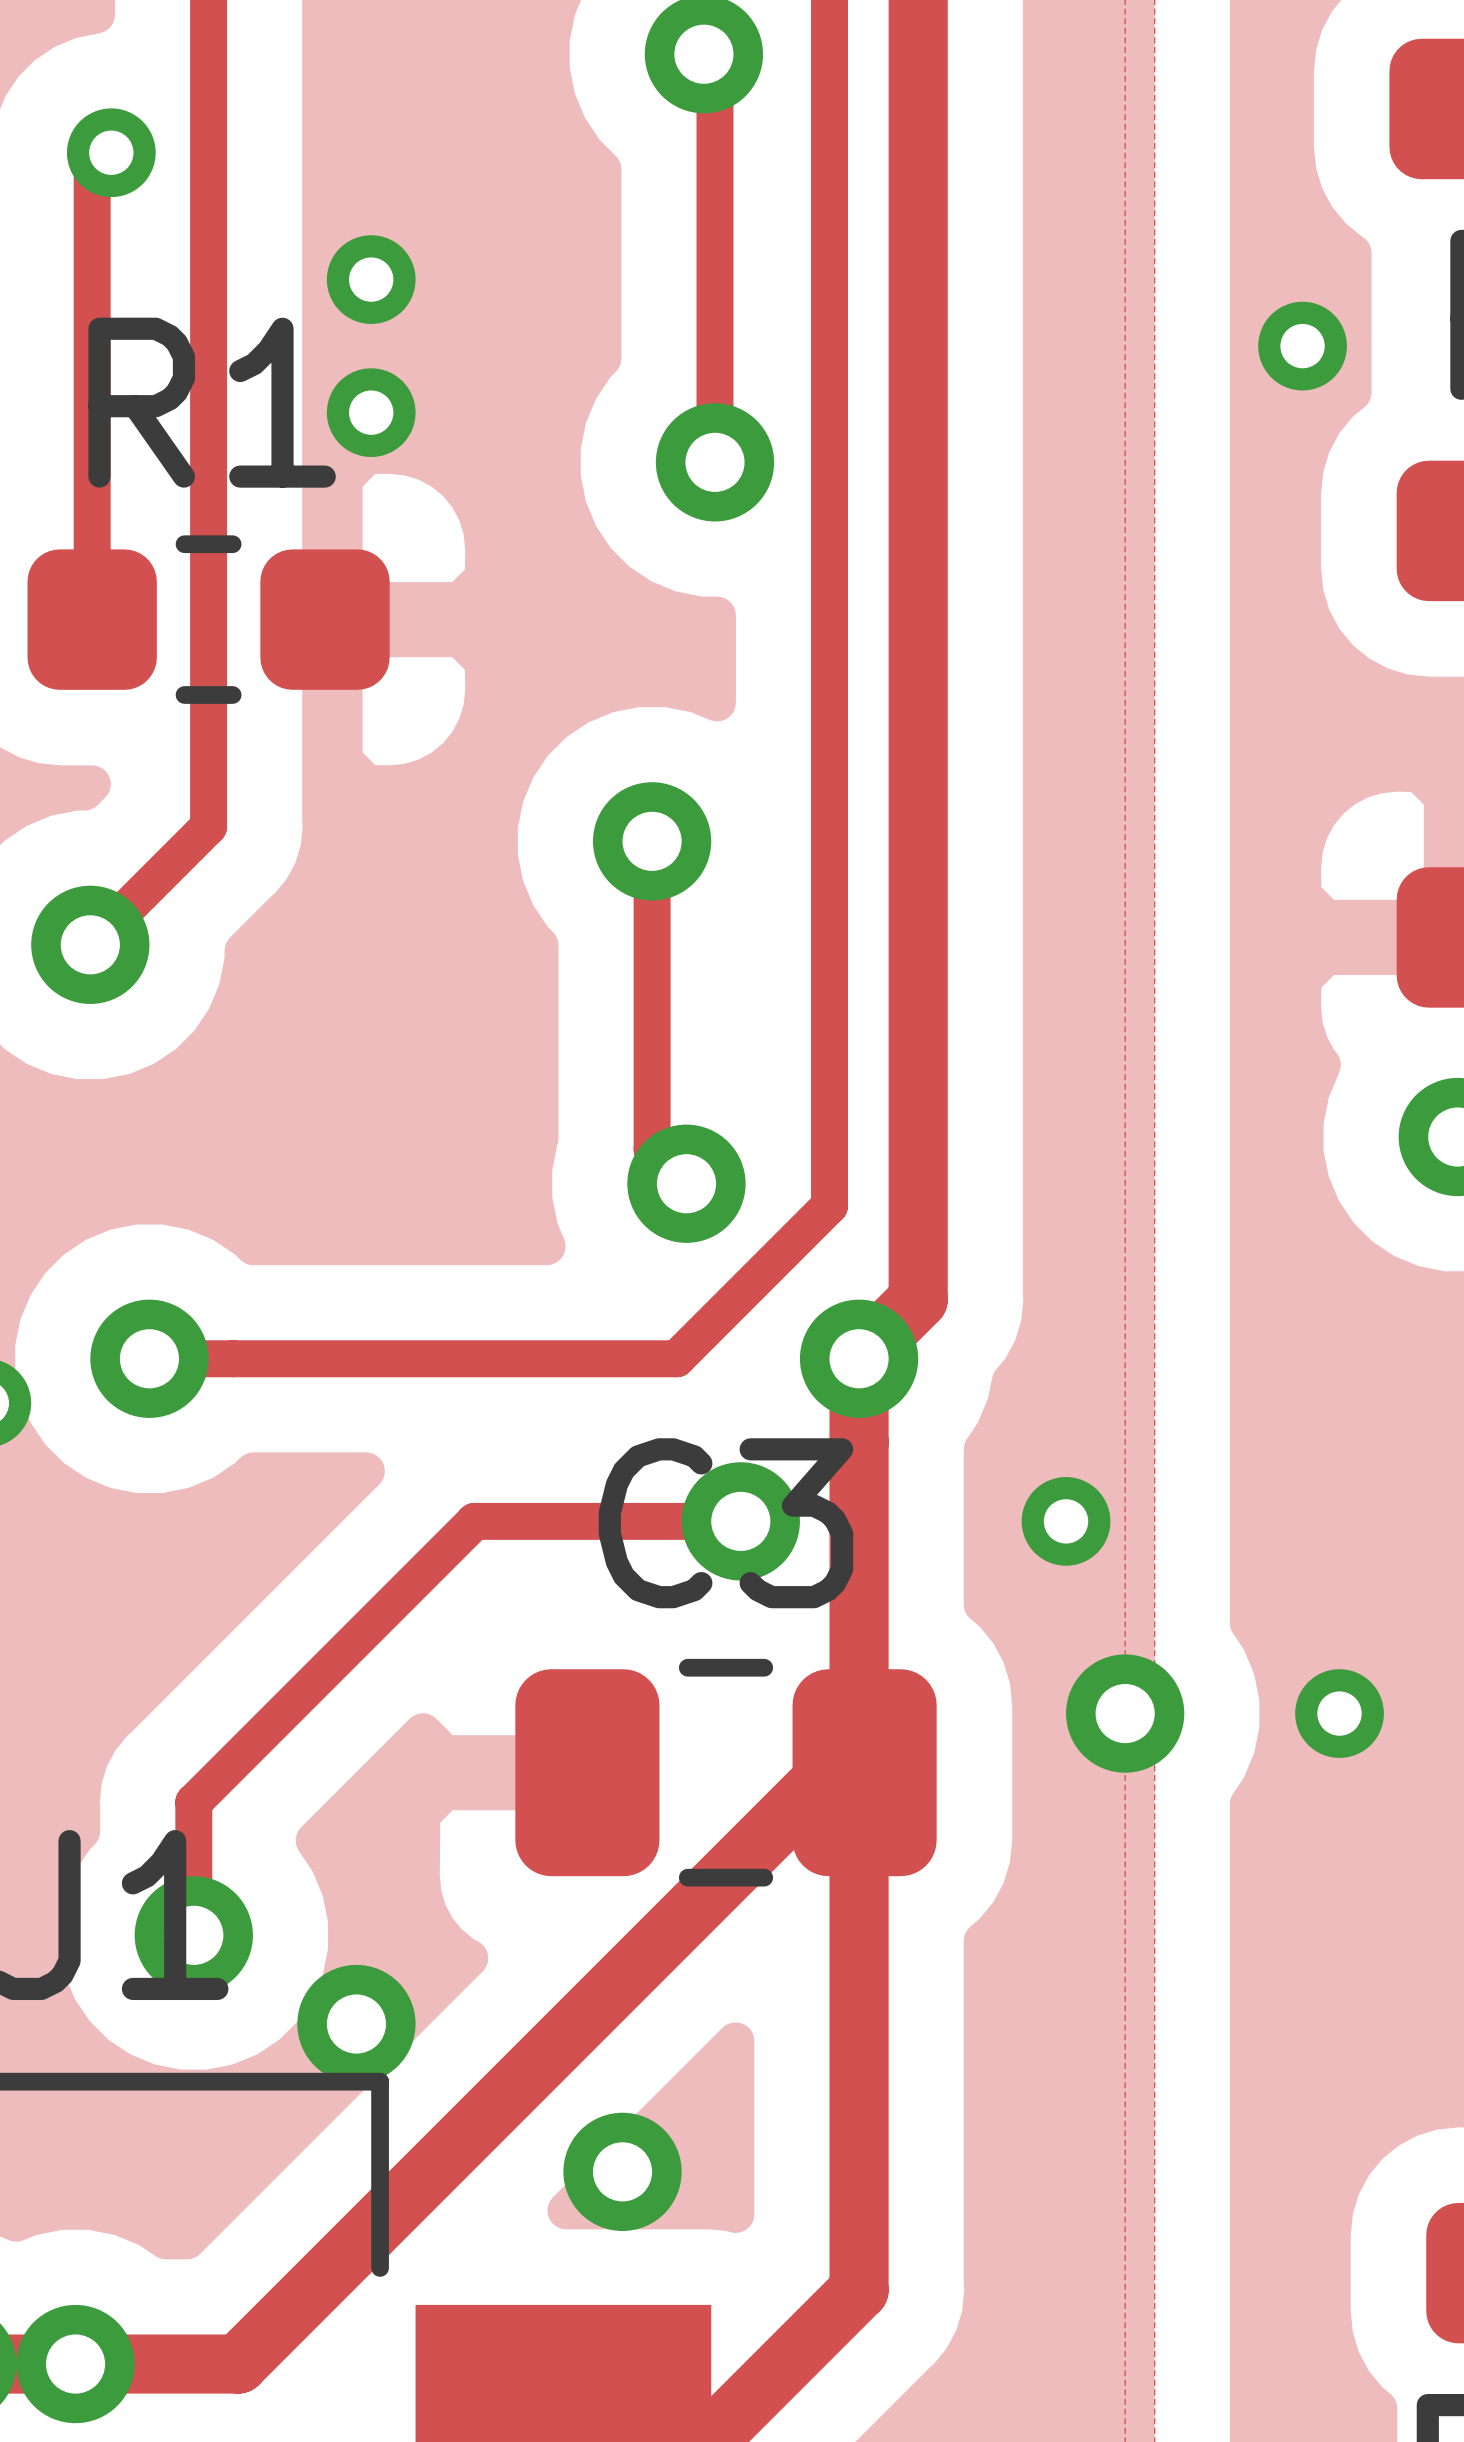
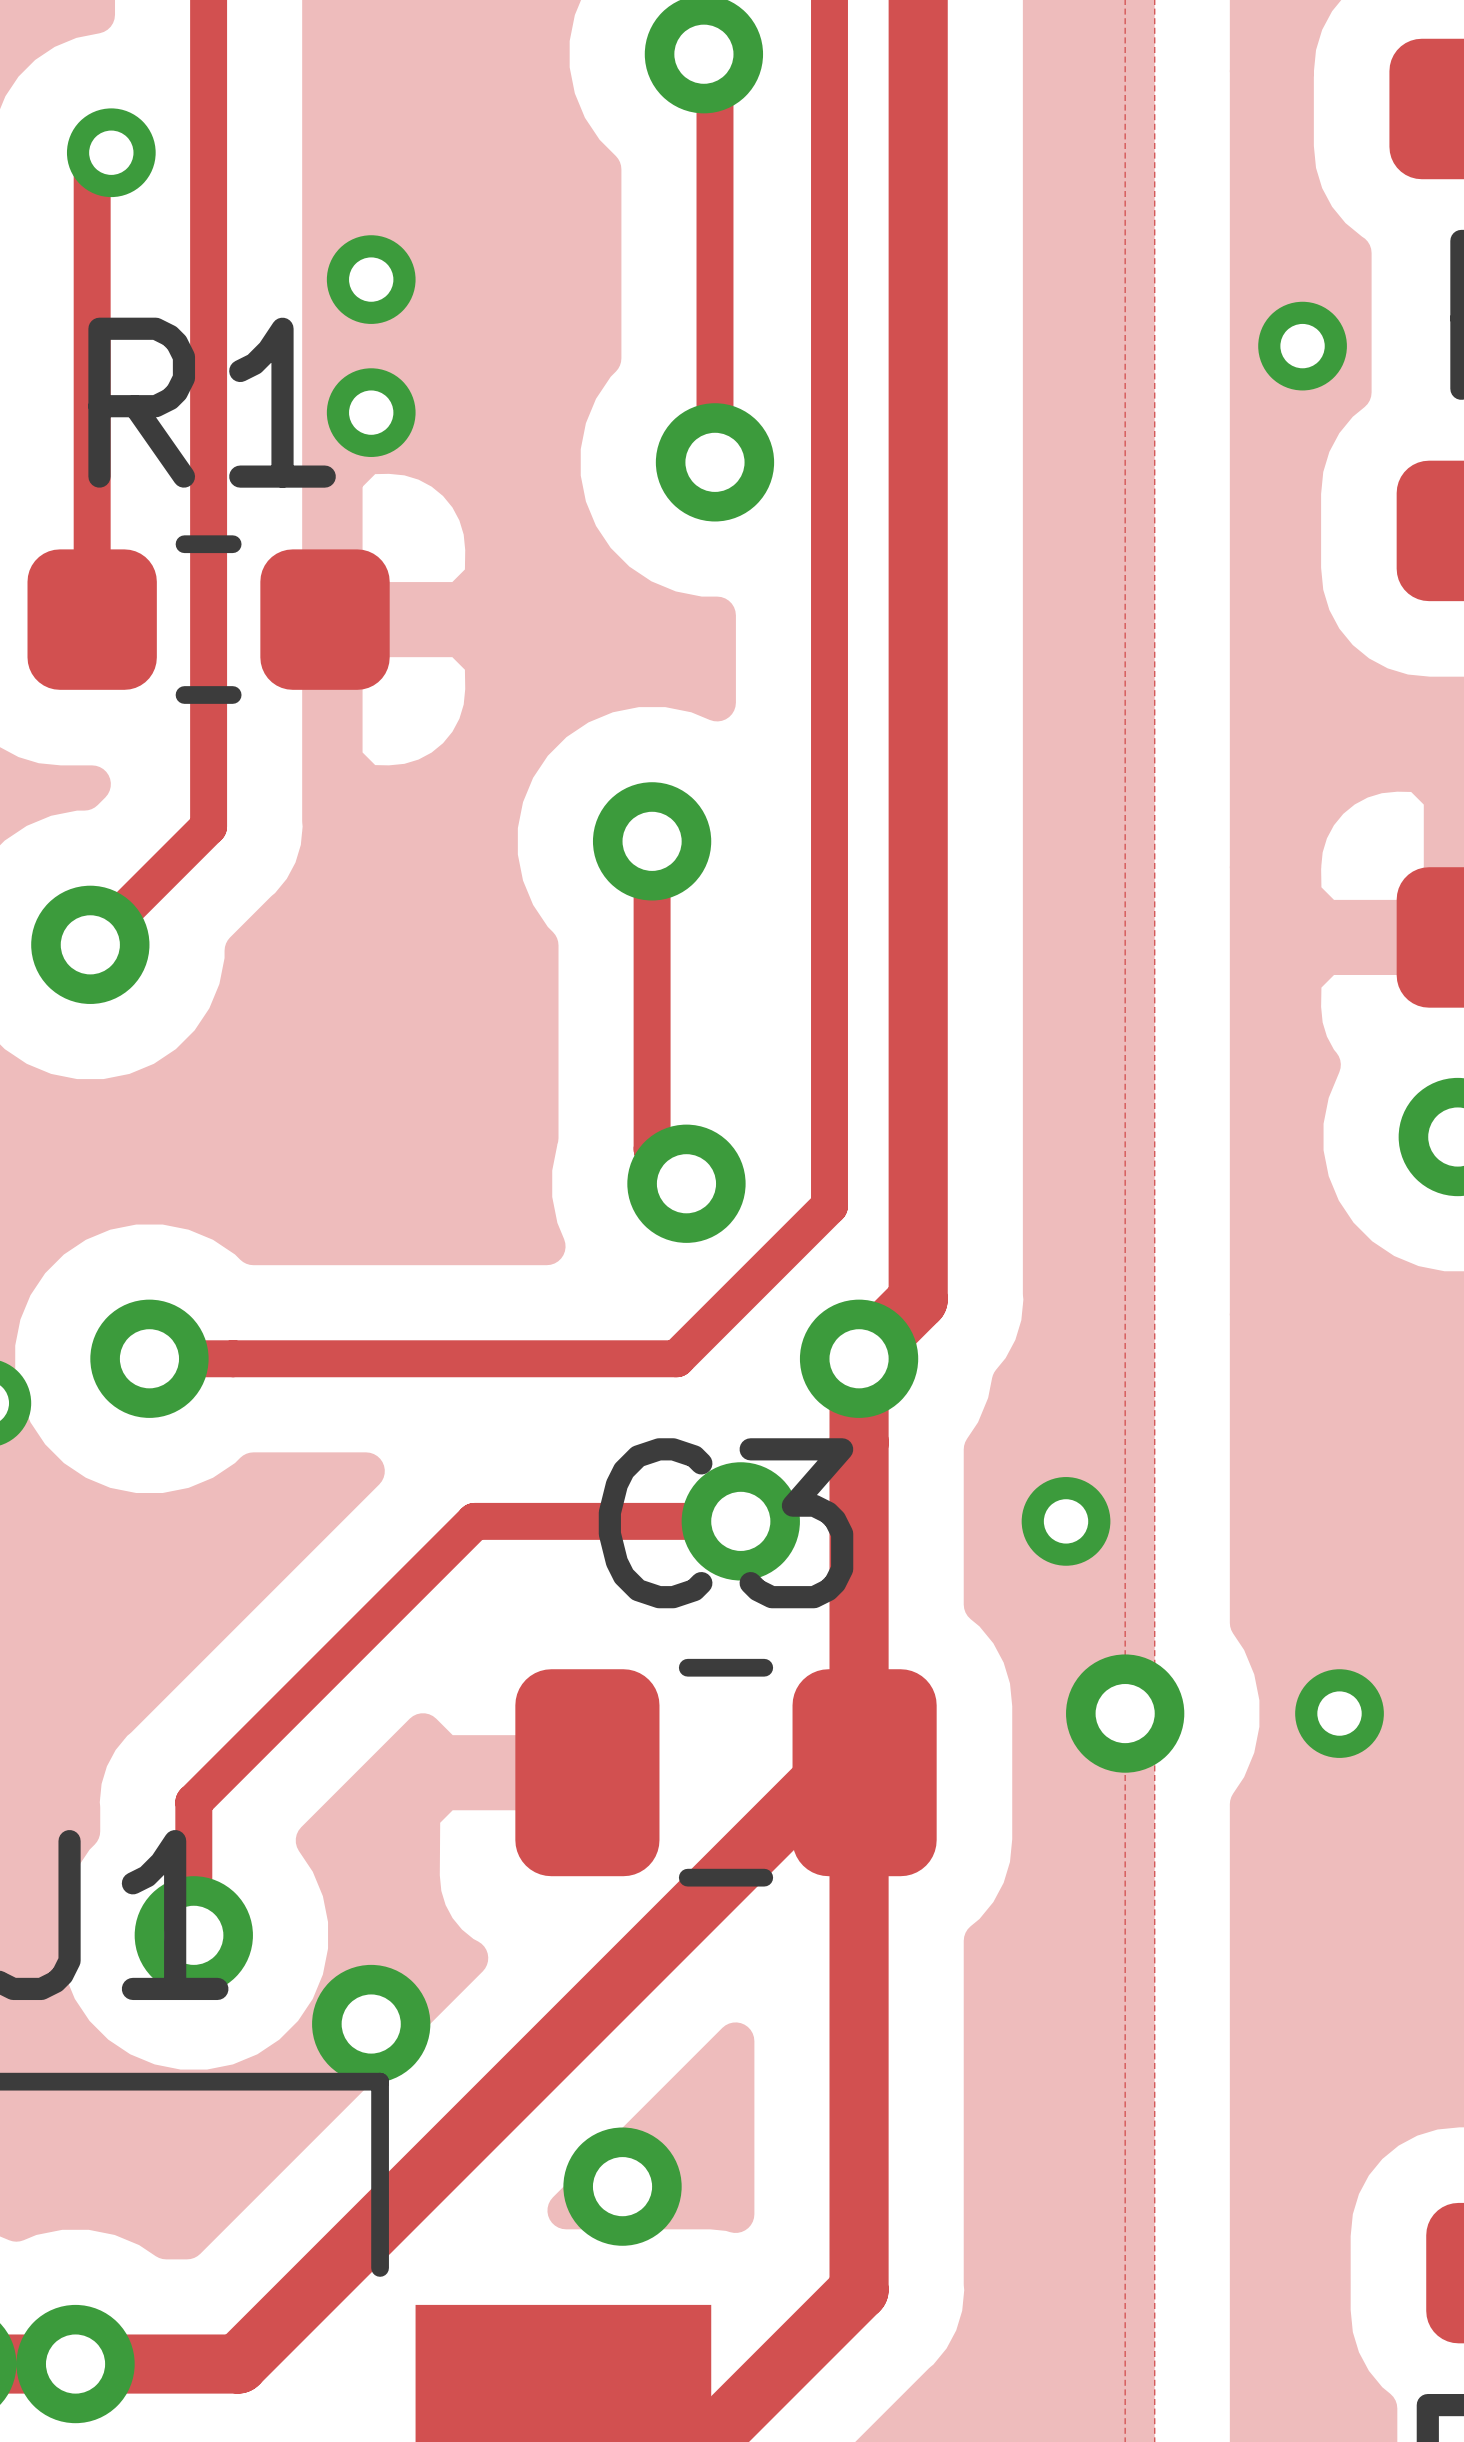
via position: (356, 2024) -> (371, 2024)
via position: (622, 2171) -> (622, 2186)

